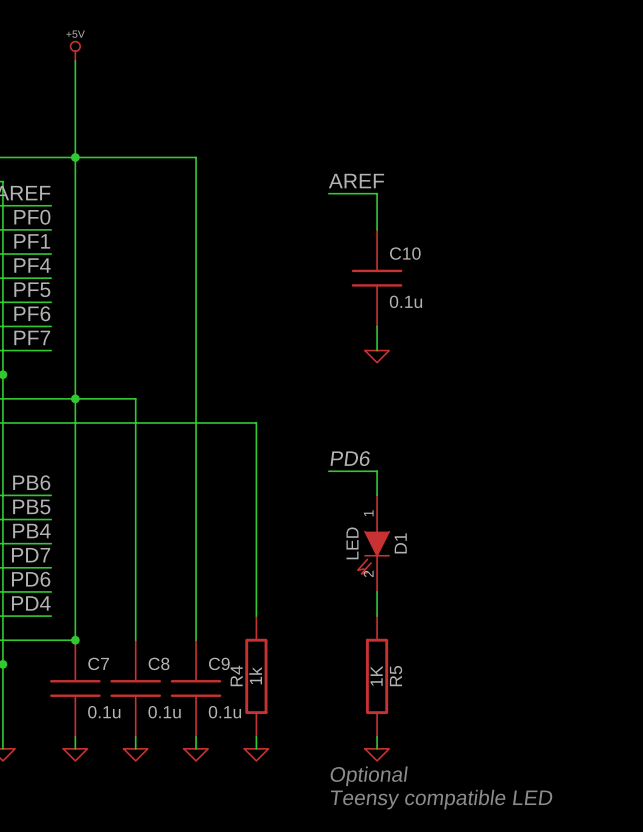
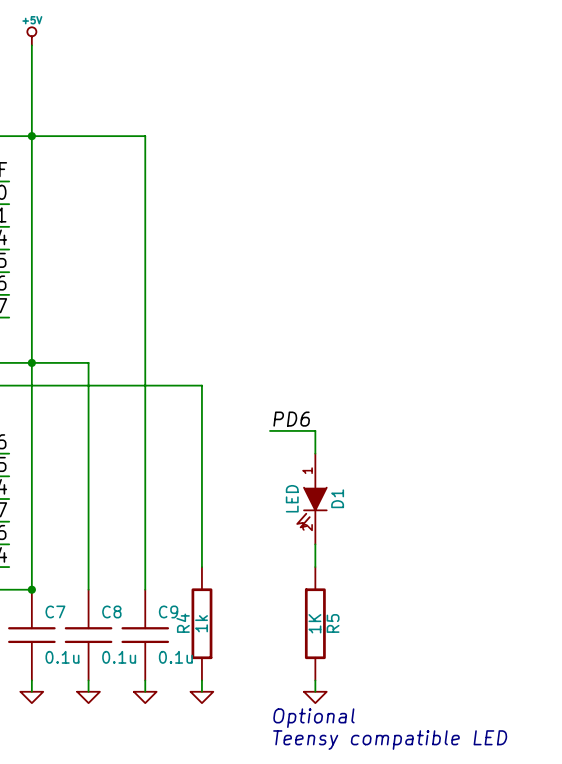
label: AREF (356, 181) -> none
wire: (328, 193) (377, 193) (377, 229) -> none
C10: 0.1u (377, 278) -> none
wire: (377, 326) (377, 350) -> none
power symbol: (377, 356) -> none

